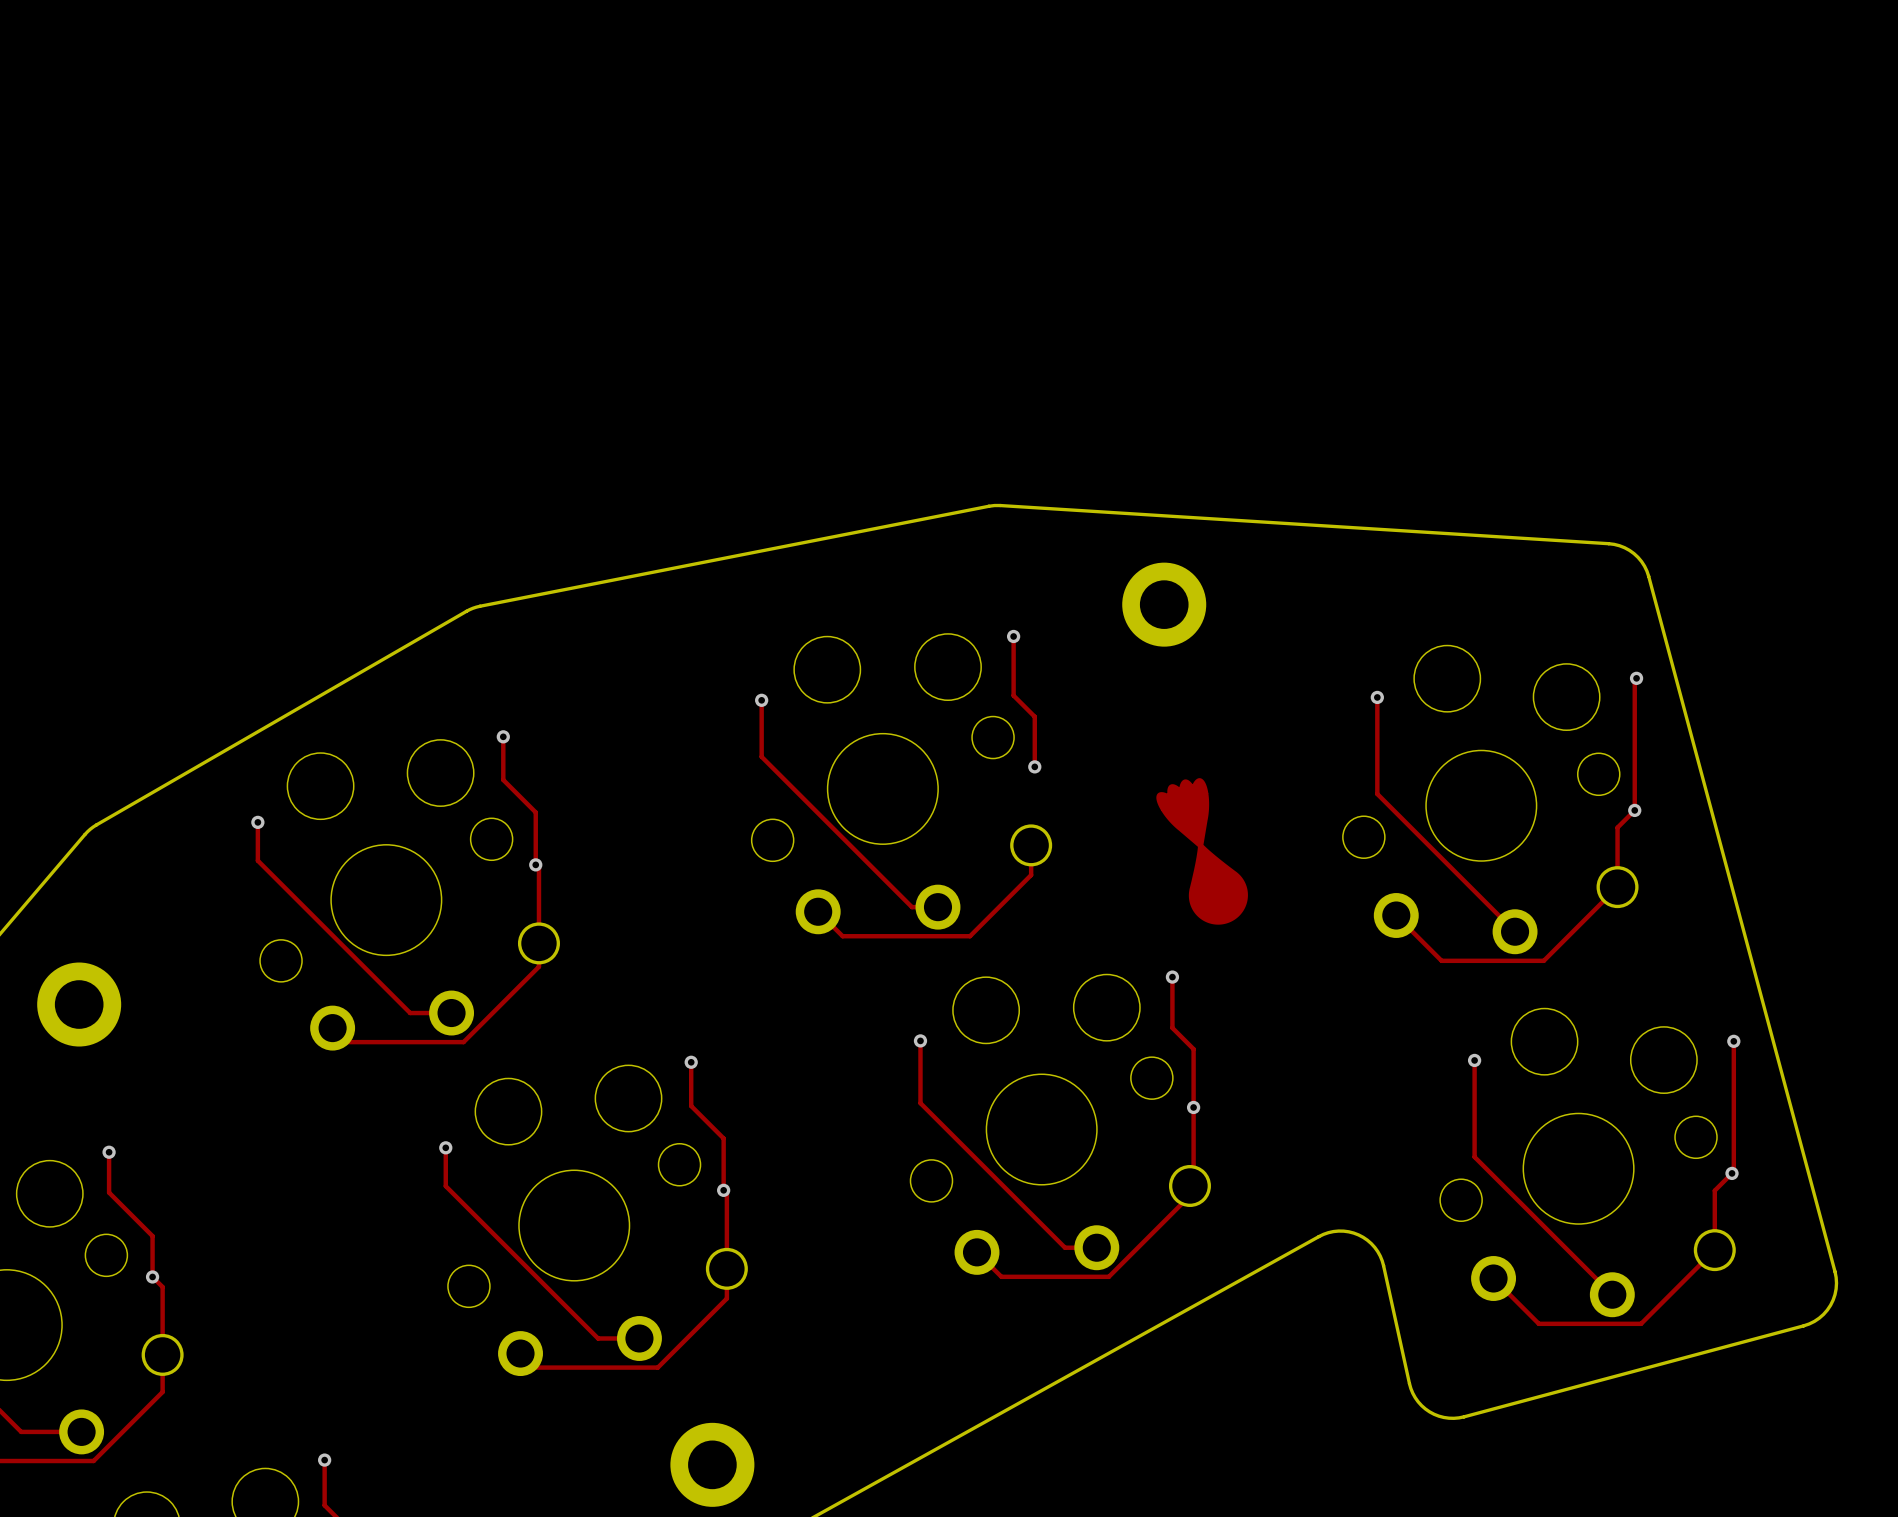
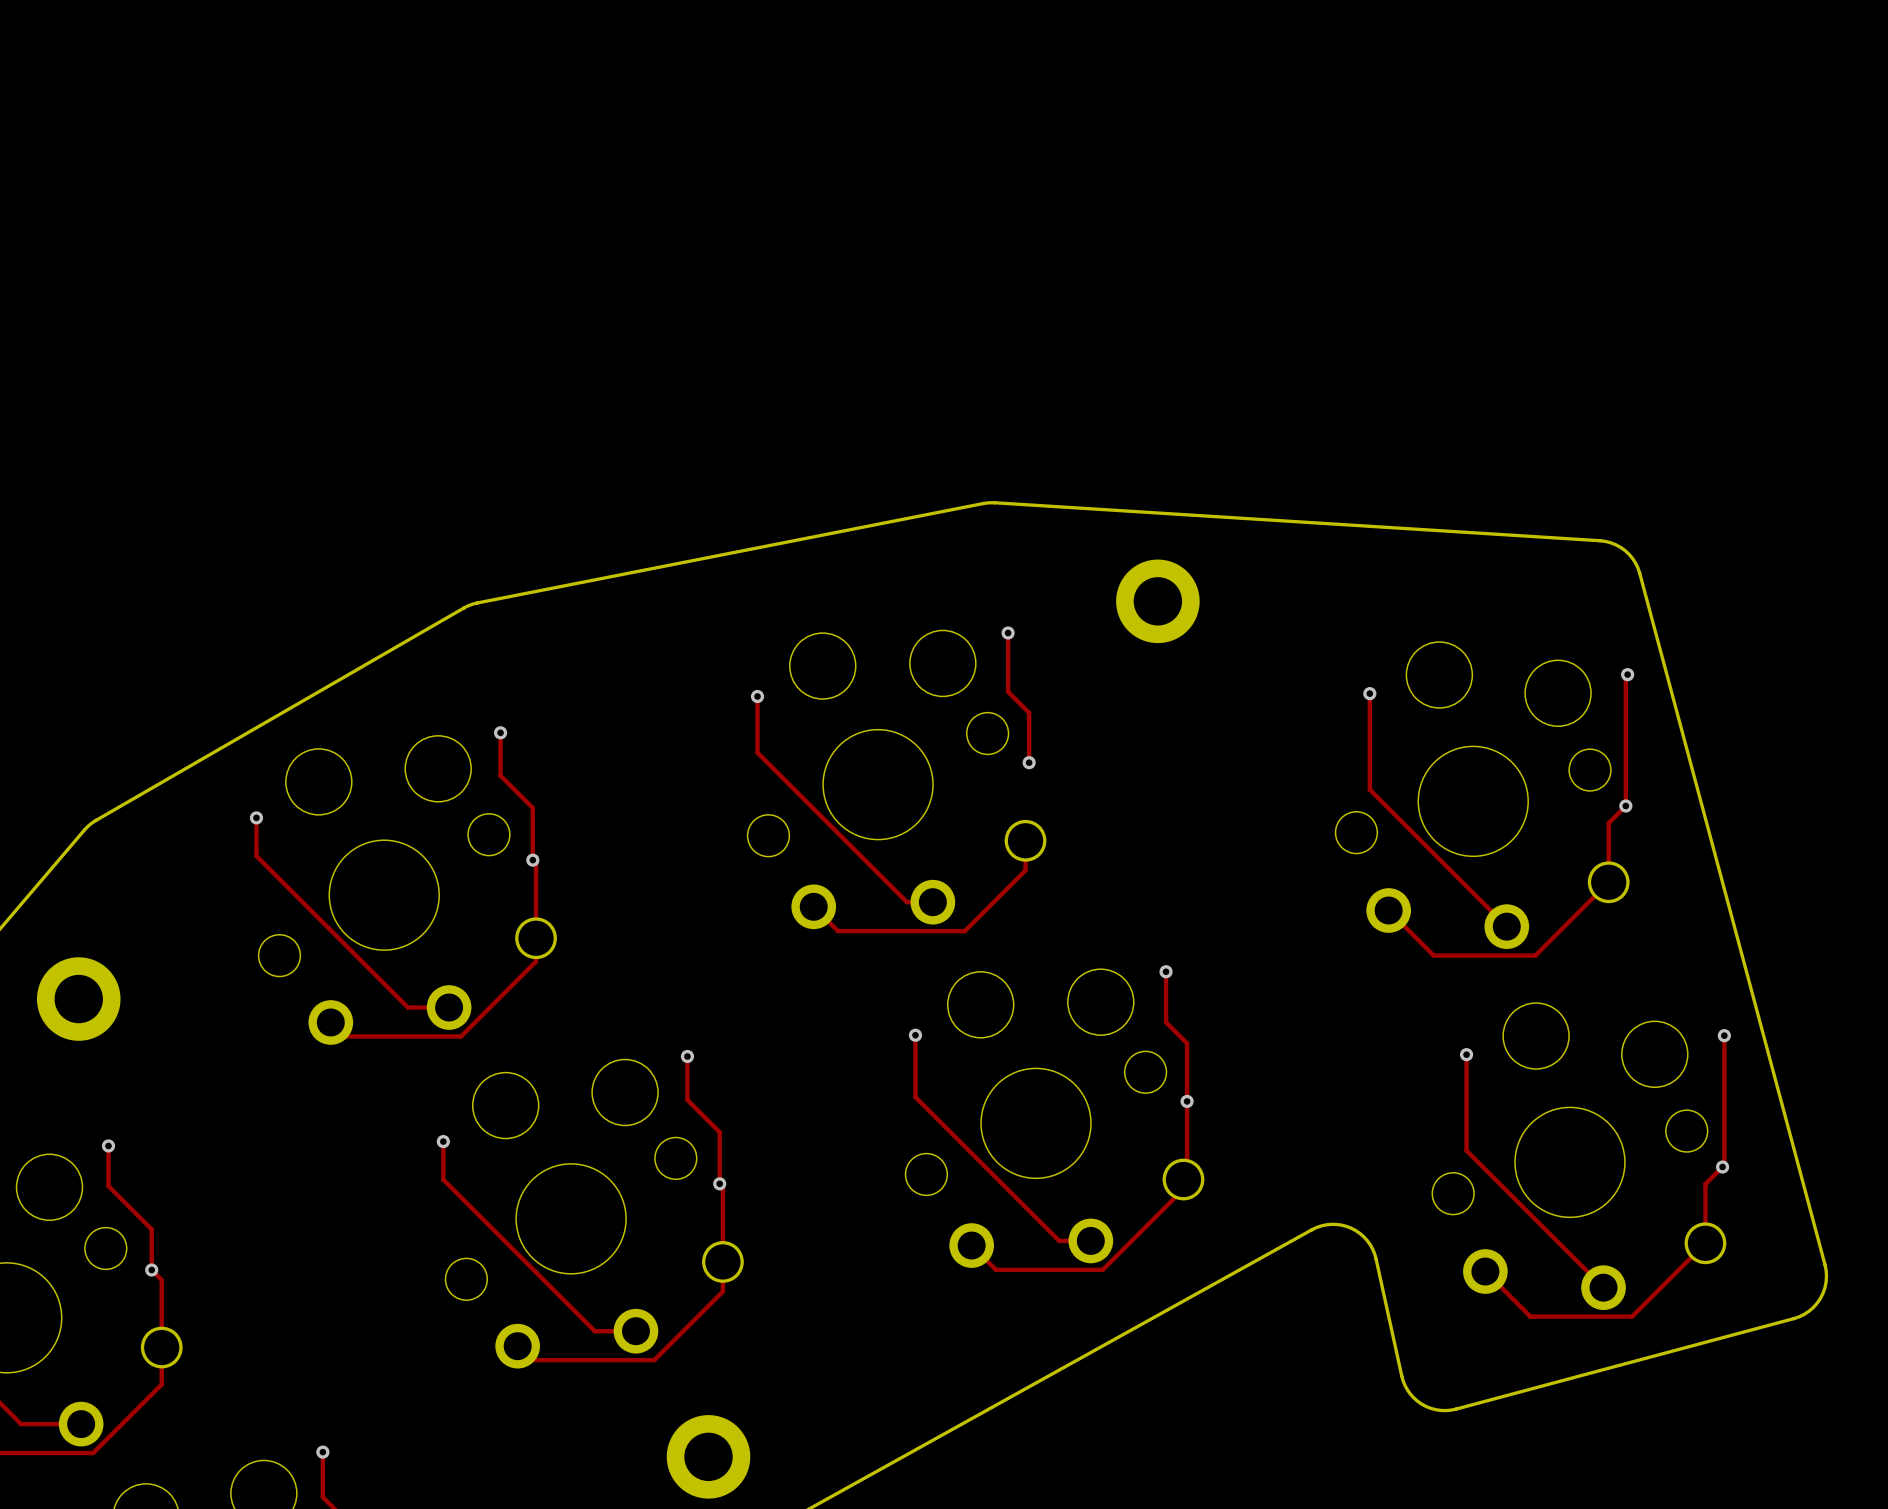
drawing: [1156, 778, 1248, 925] -> none

